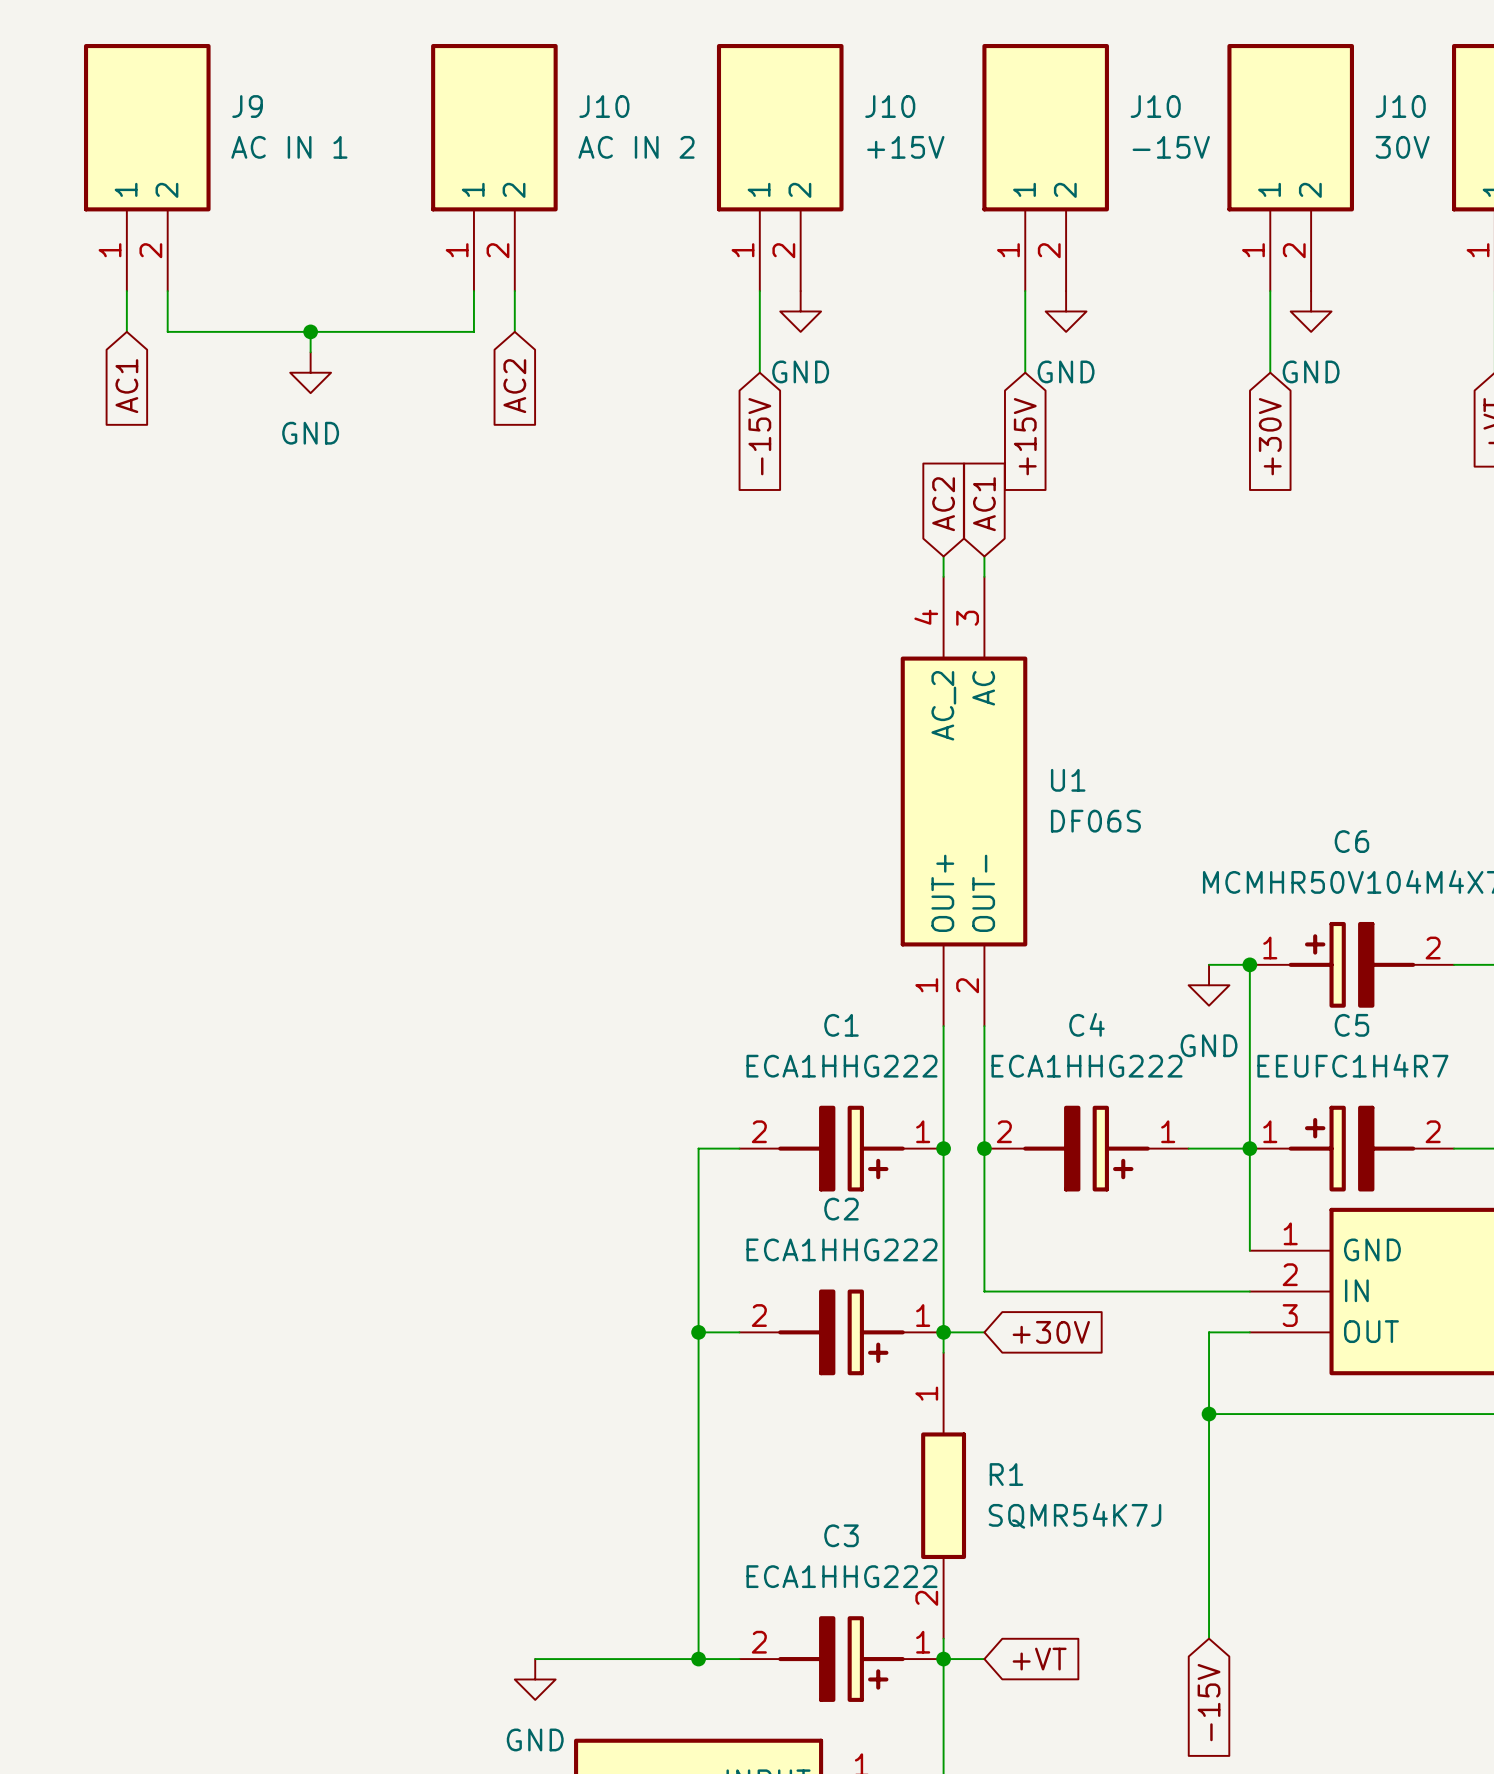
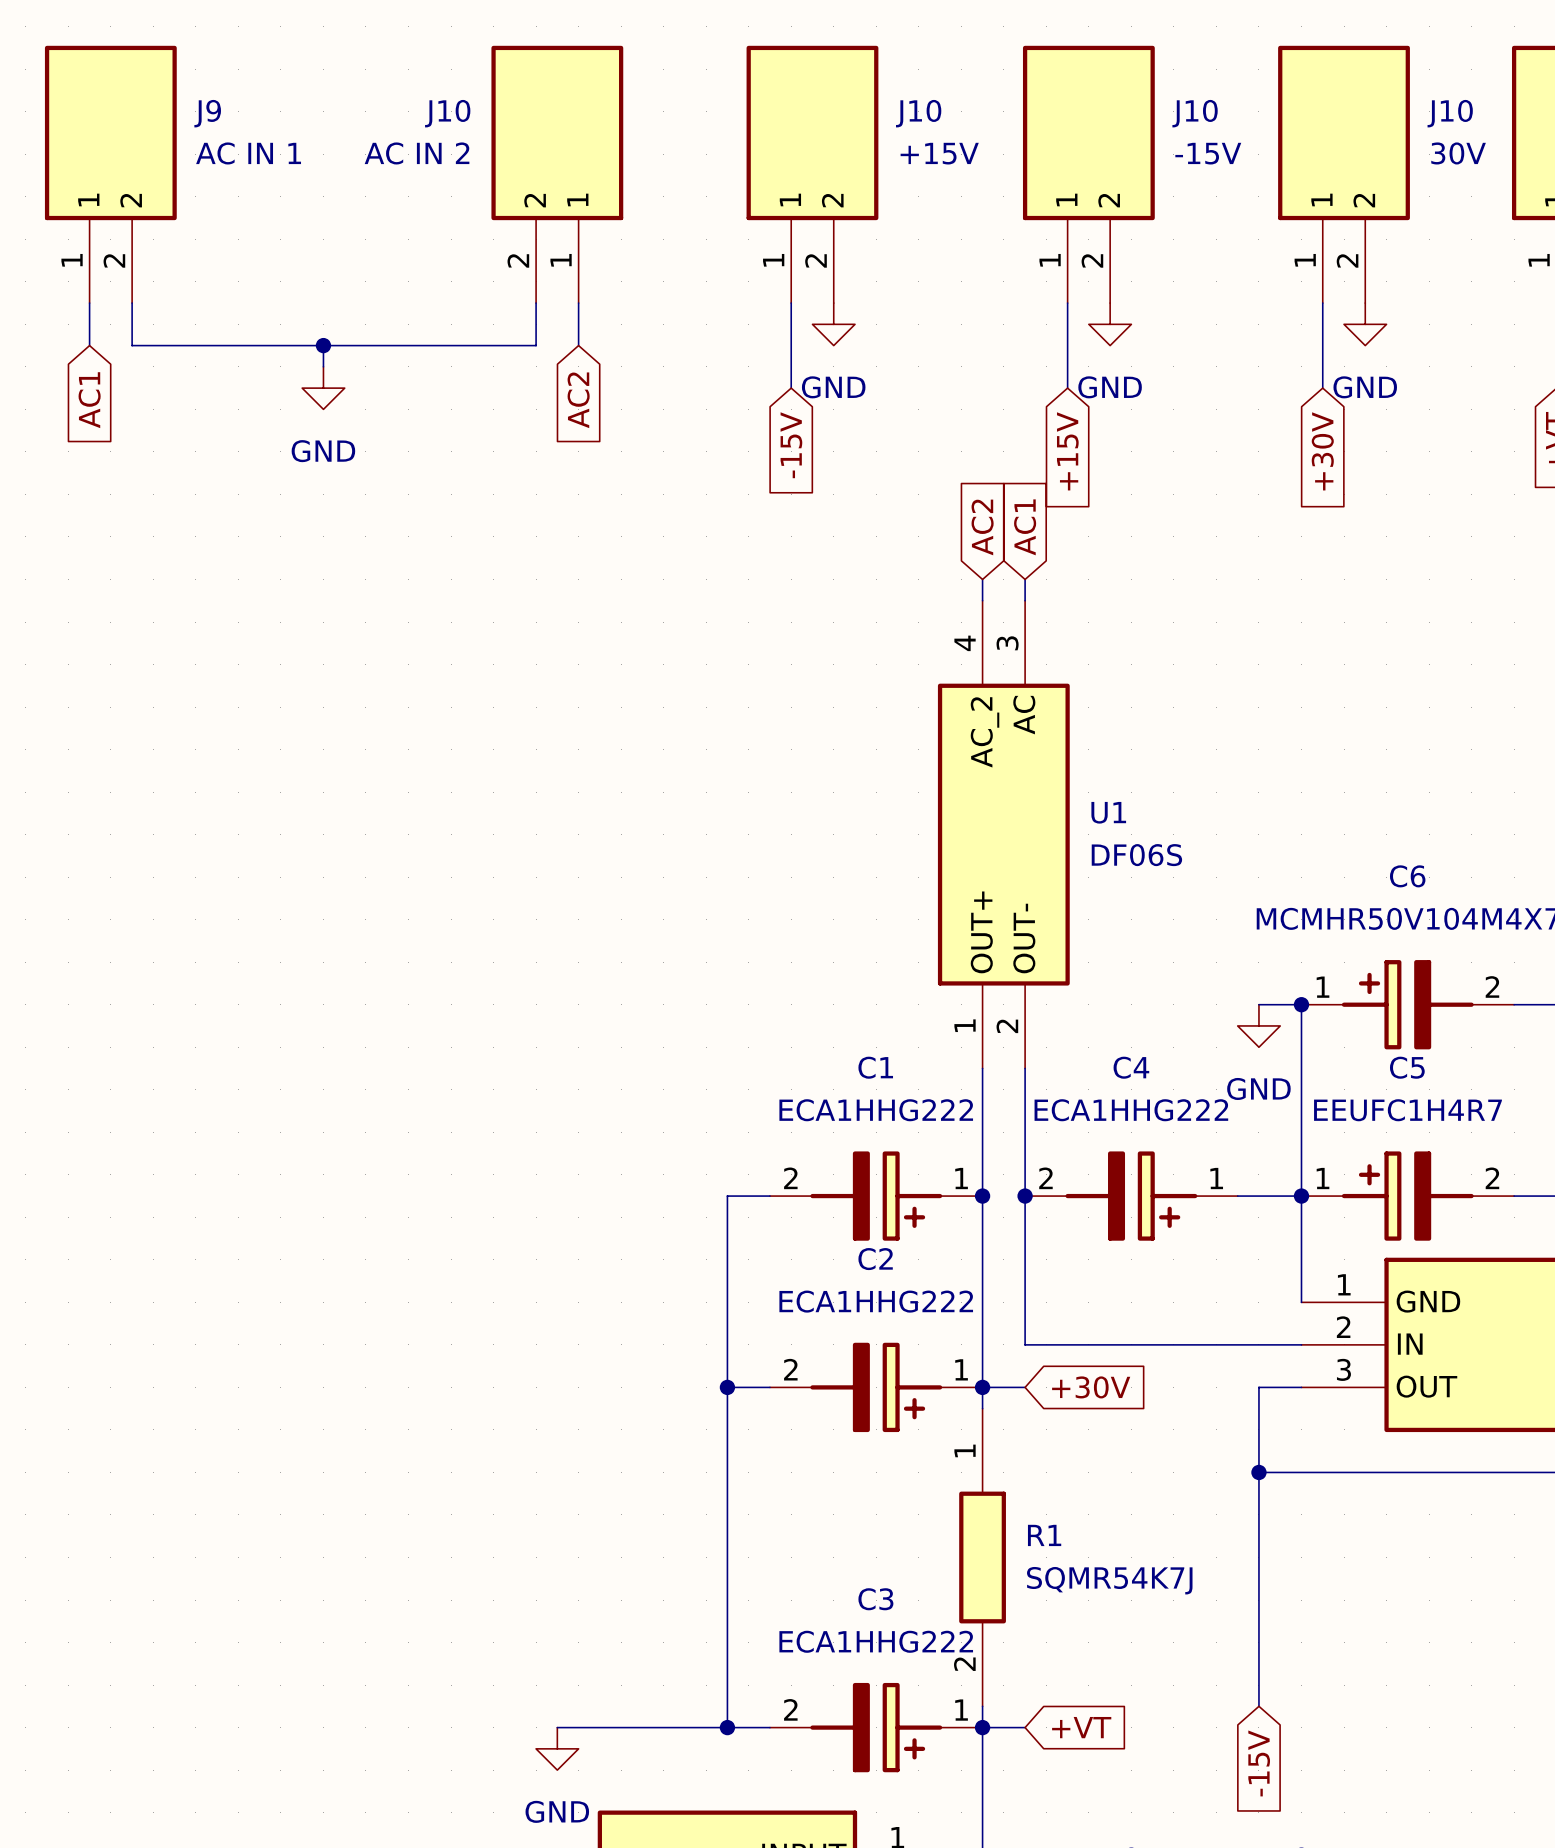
J9 position: (147, 167) -> (110, 174)
J10: AC IN 2 (494, 167) -> none
J10: none -> AC IN 2 (557, 174)
wire: none -> (89, 303) (89, 345)
wire: (167, 291) (167, 331) -> (132, 345) (174, 345)
wire: (473, 291) (473, 331) -> (536, 345) (493, 345)
wire: none -> (578, 303) (578, 345)
global label position: AC1 (126, 386) -> AC1 (89, 400)
global label position: AC2 (514, 386) -> AC2 (578, 400)

